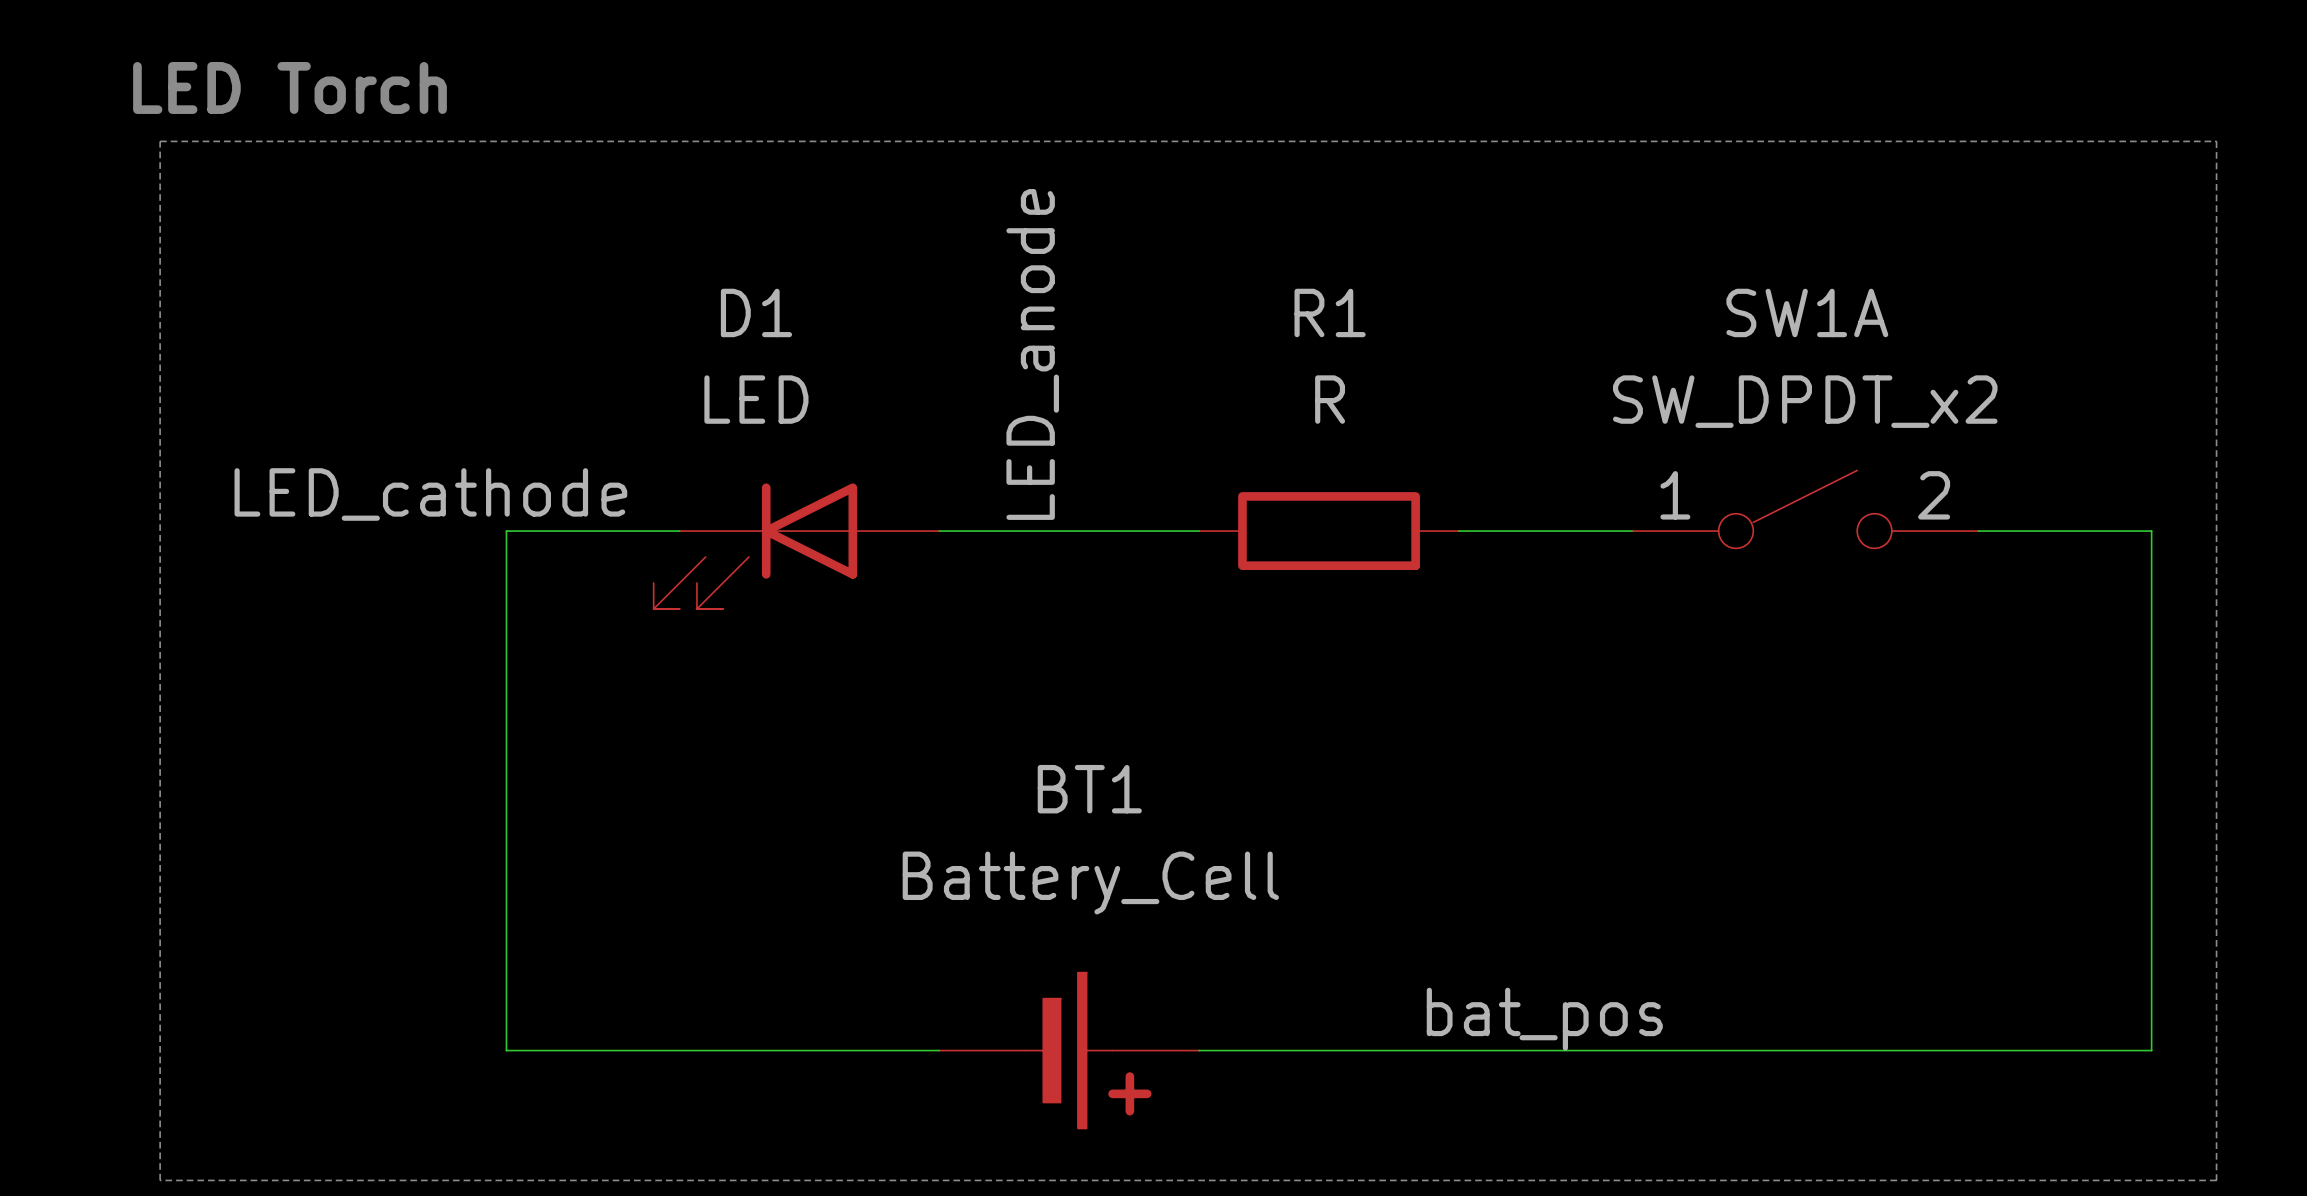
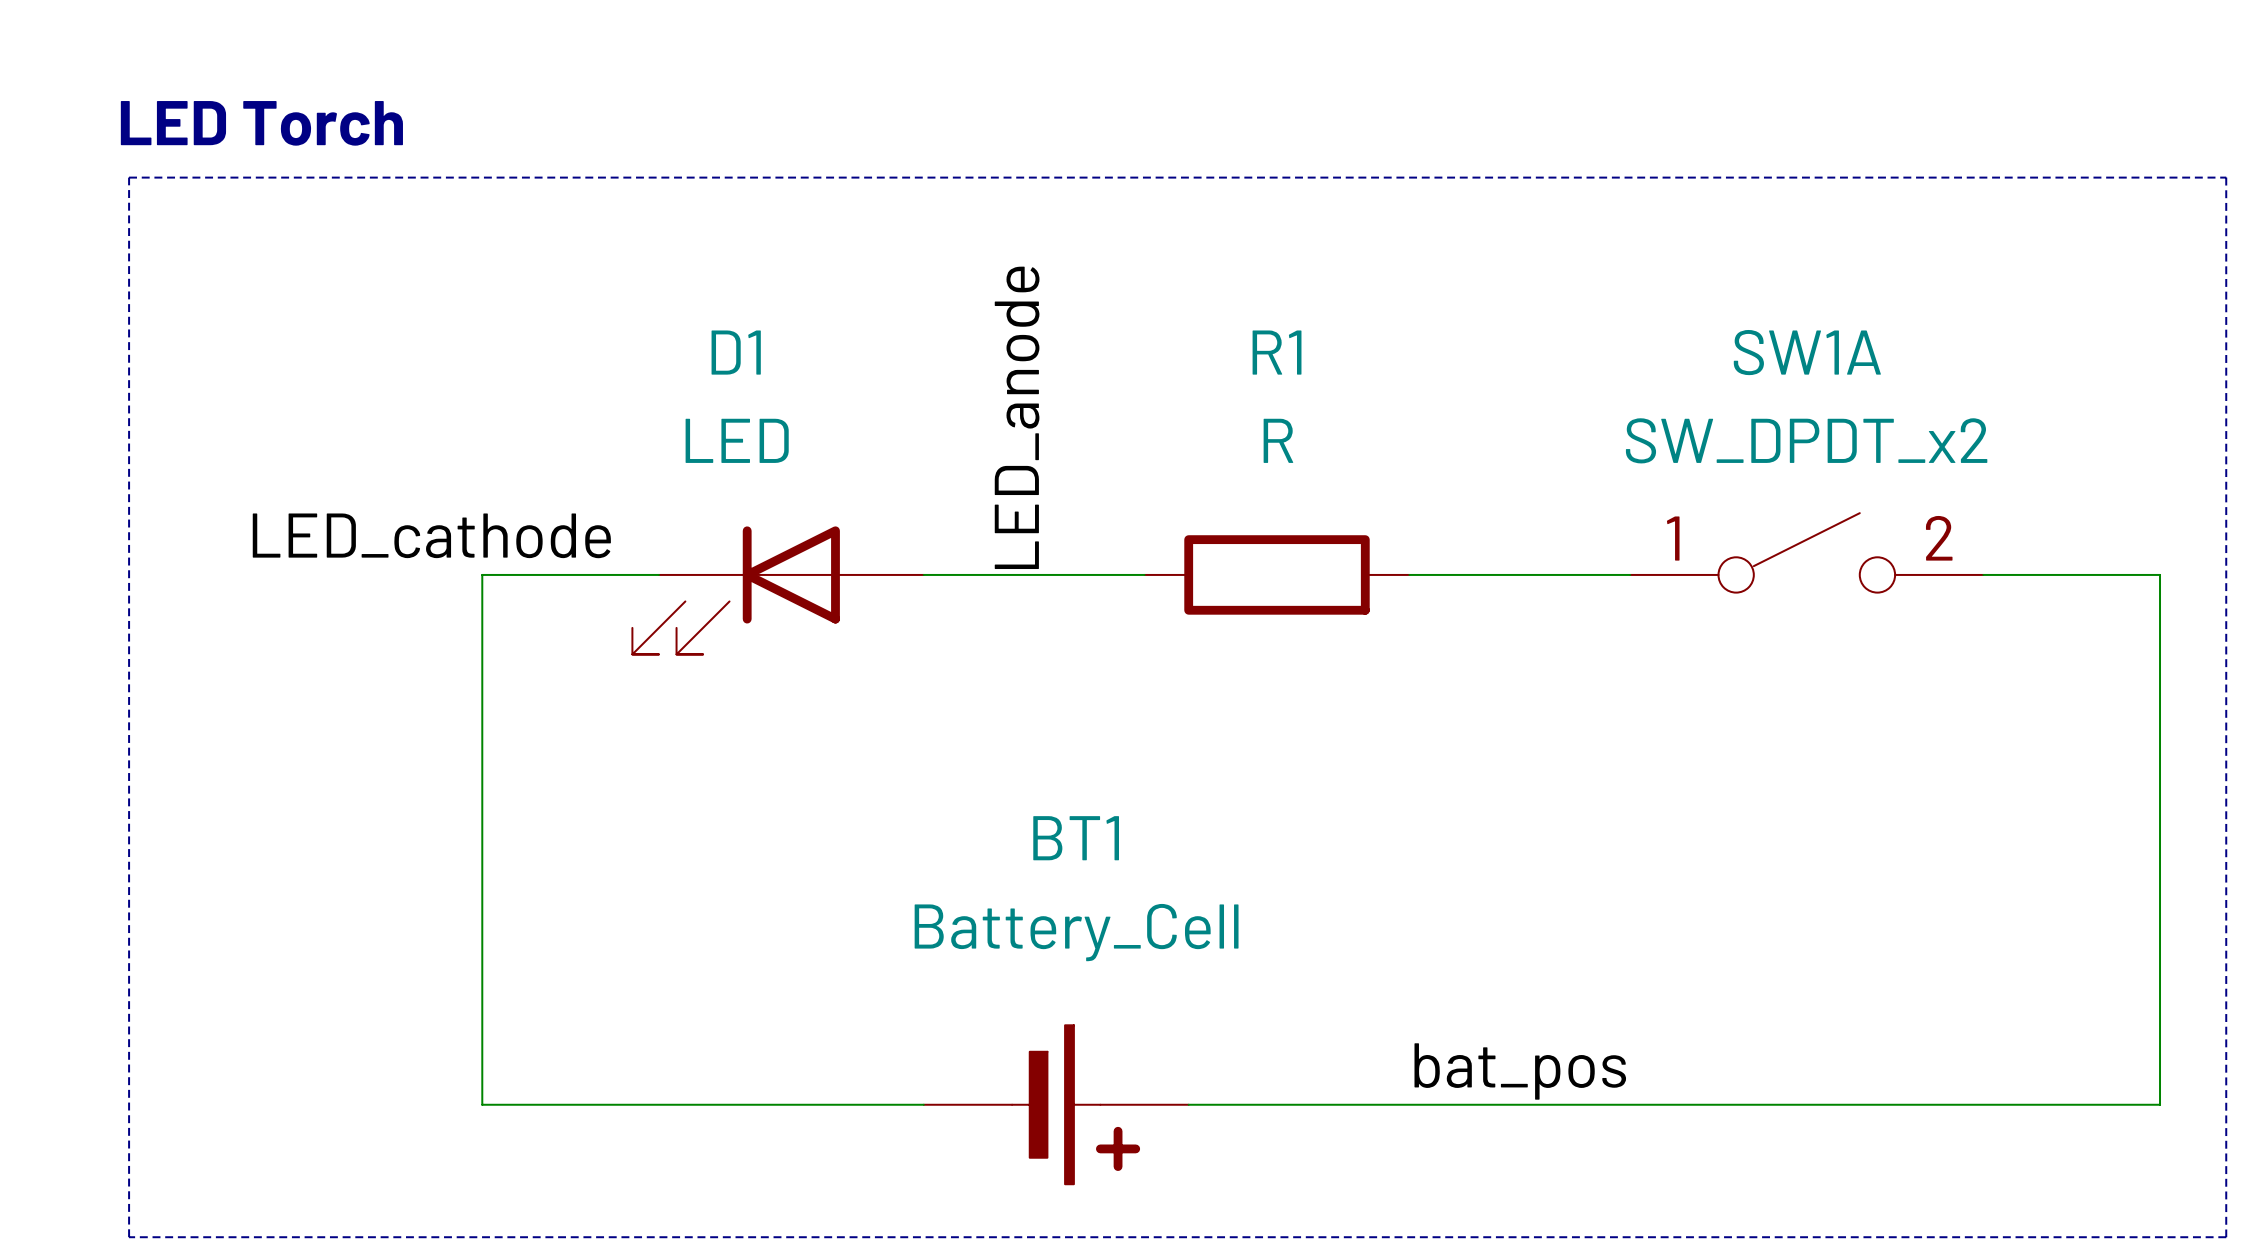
R1 position: (1329, 531) -> (1277, 574)

